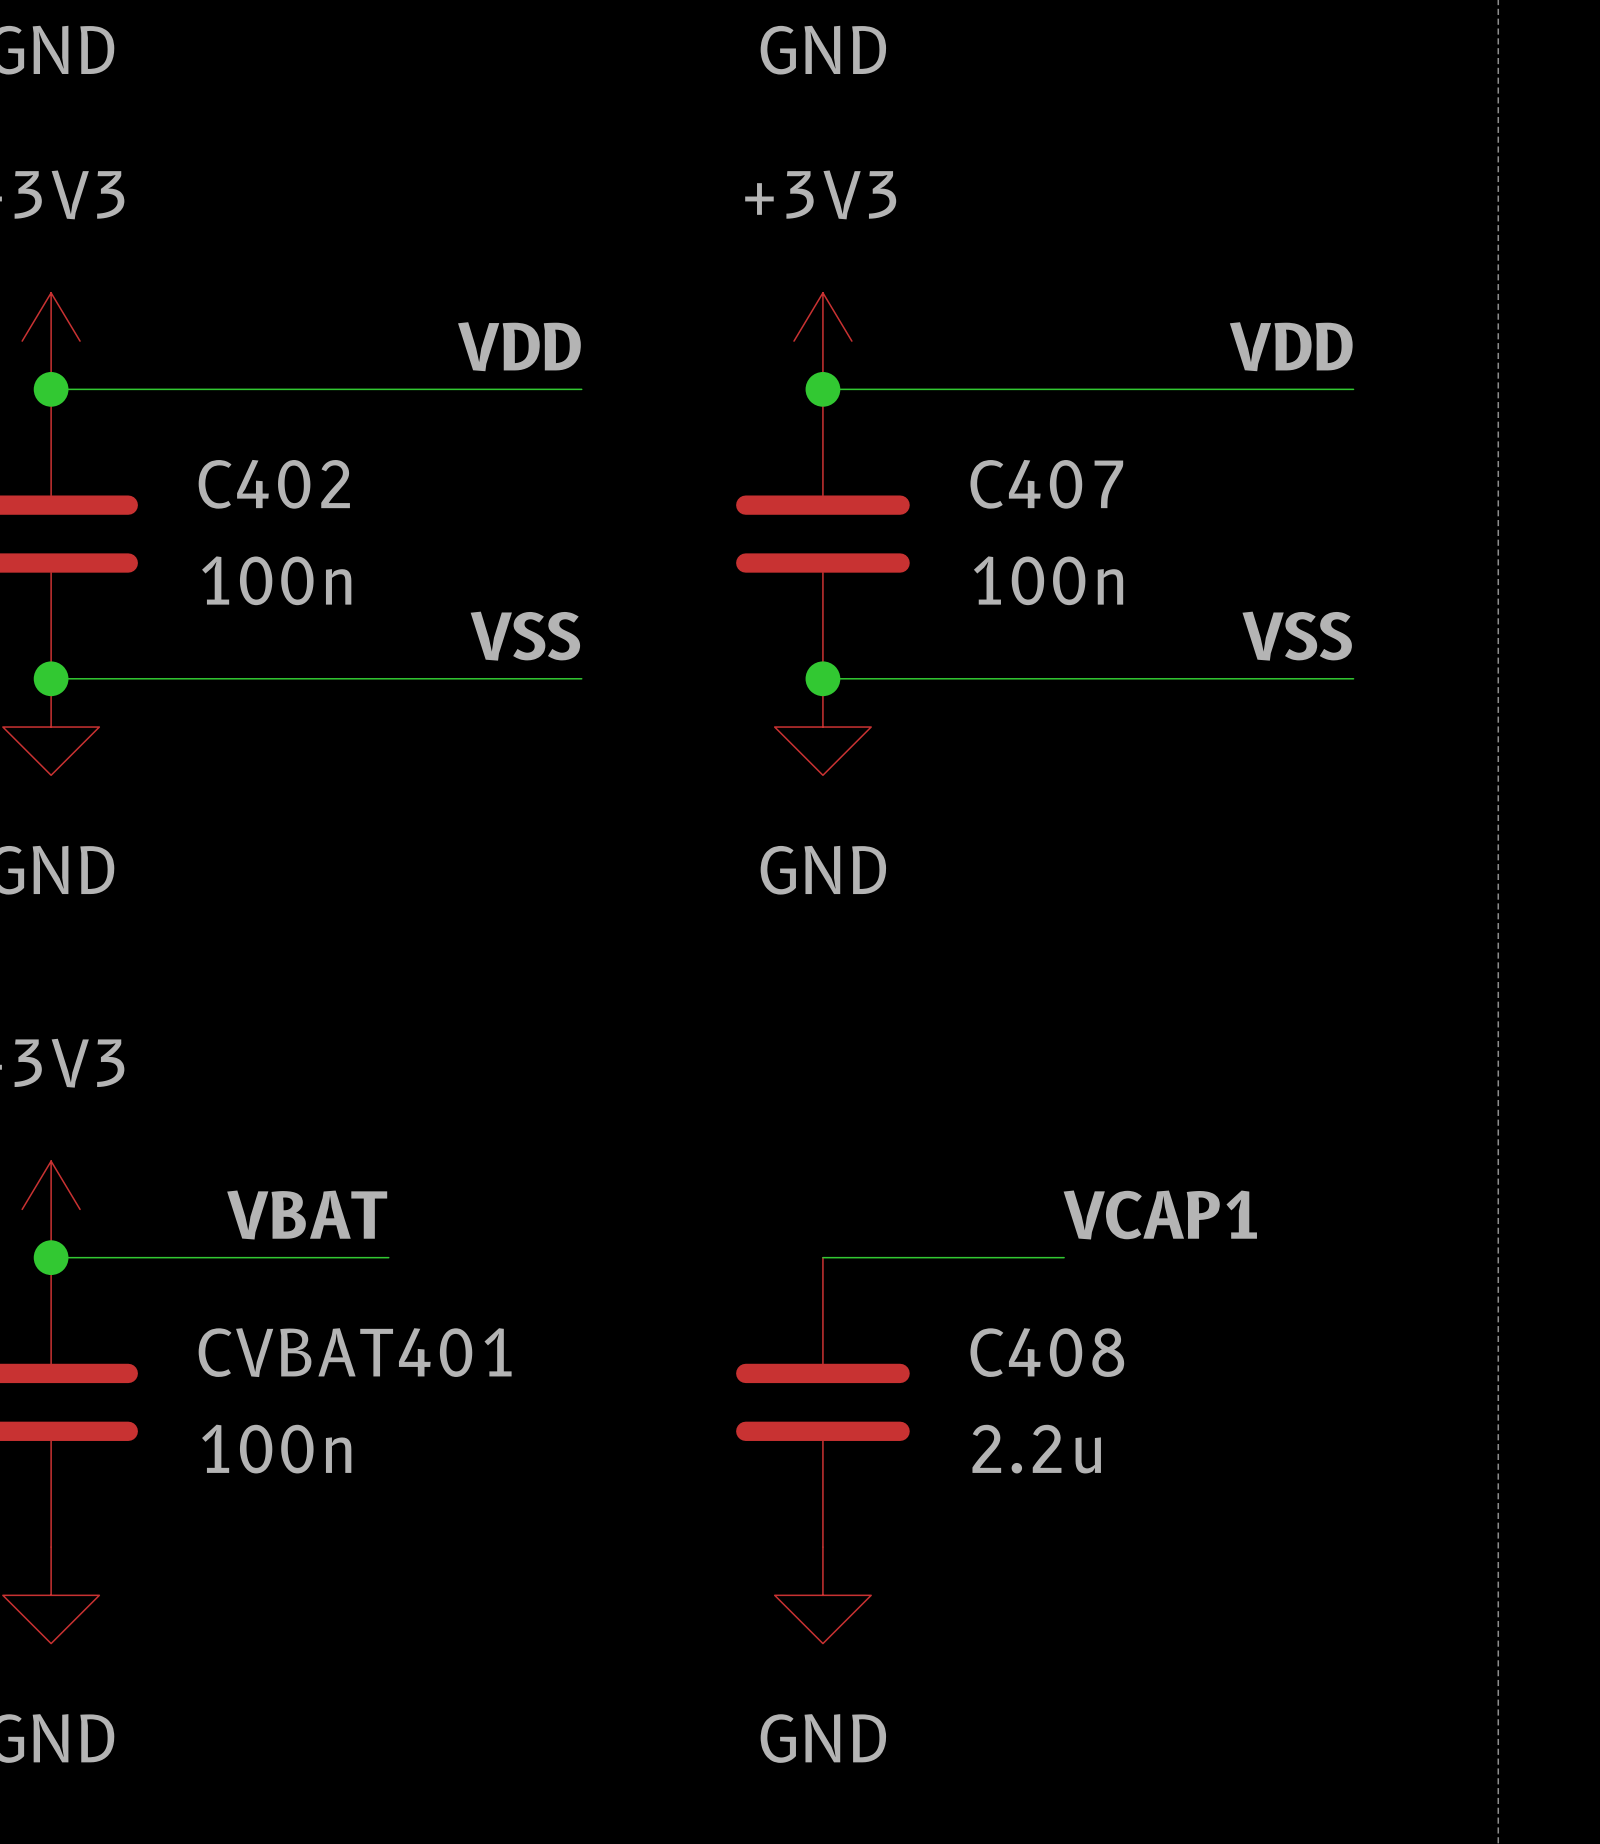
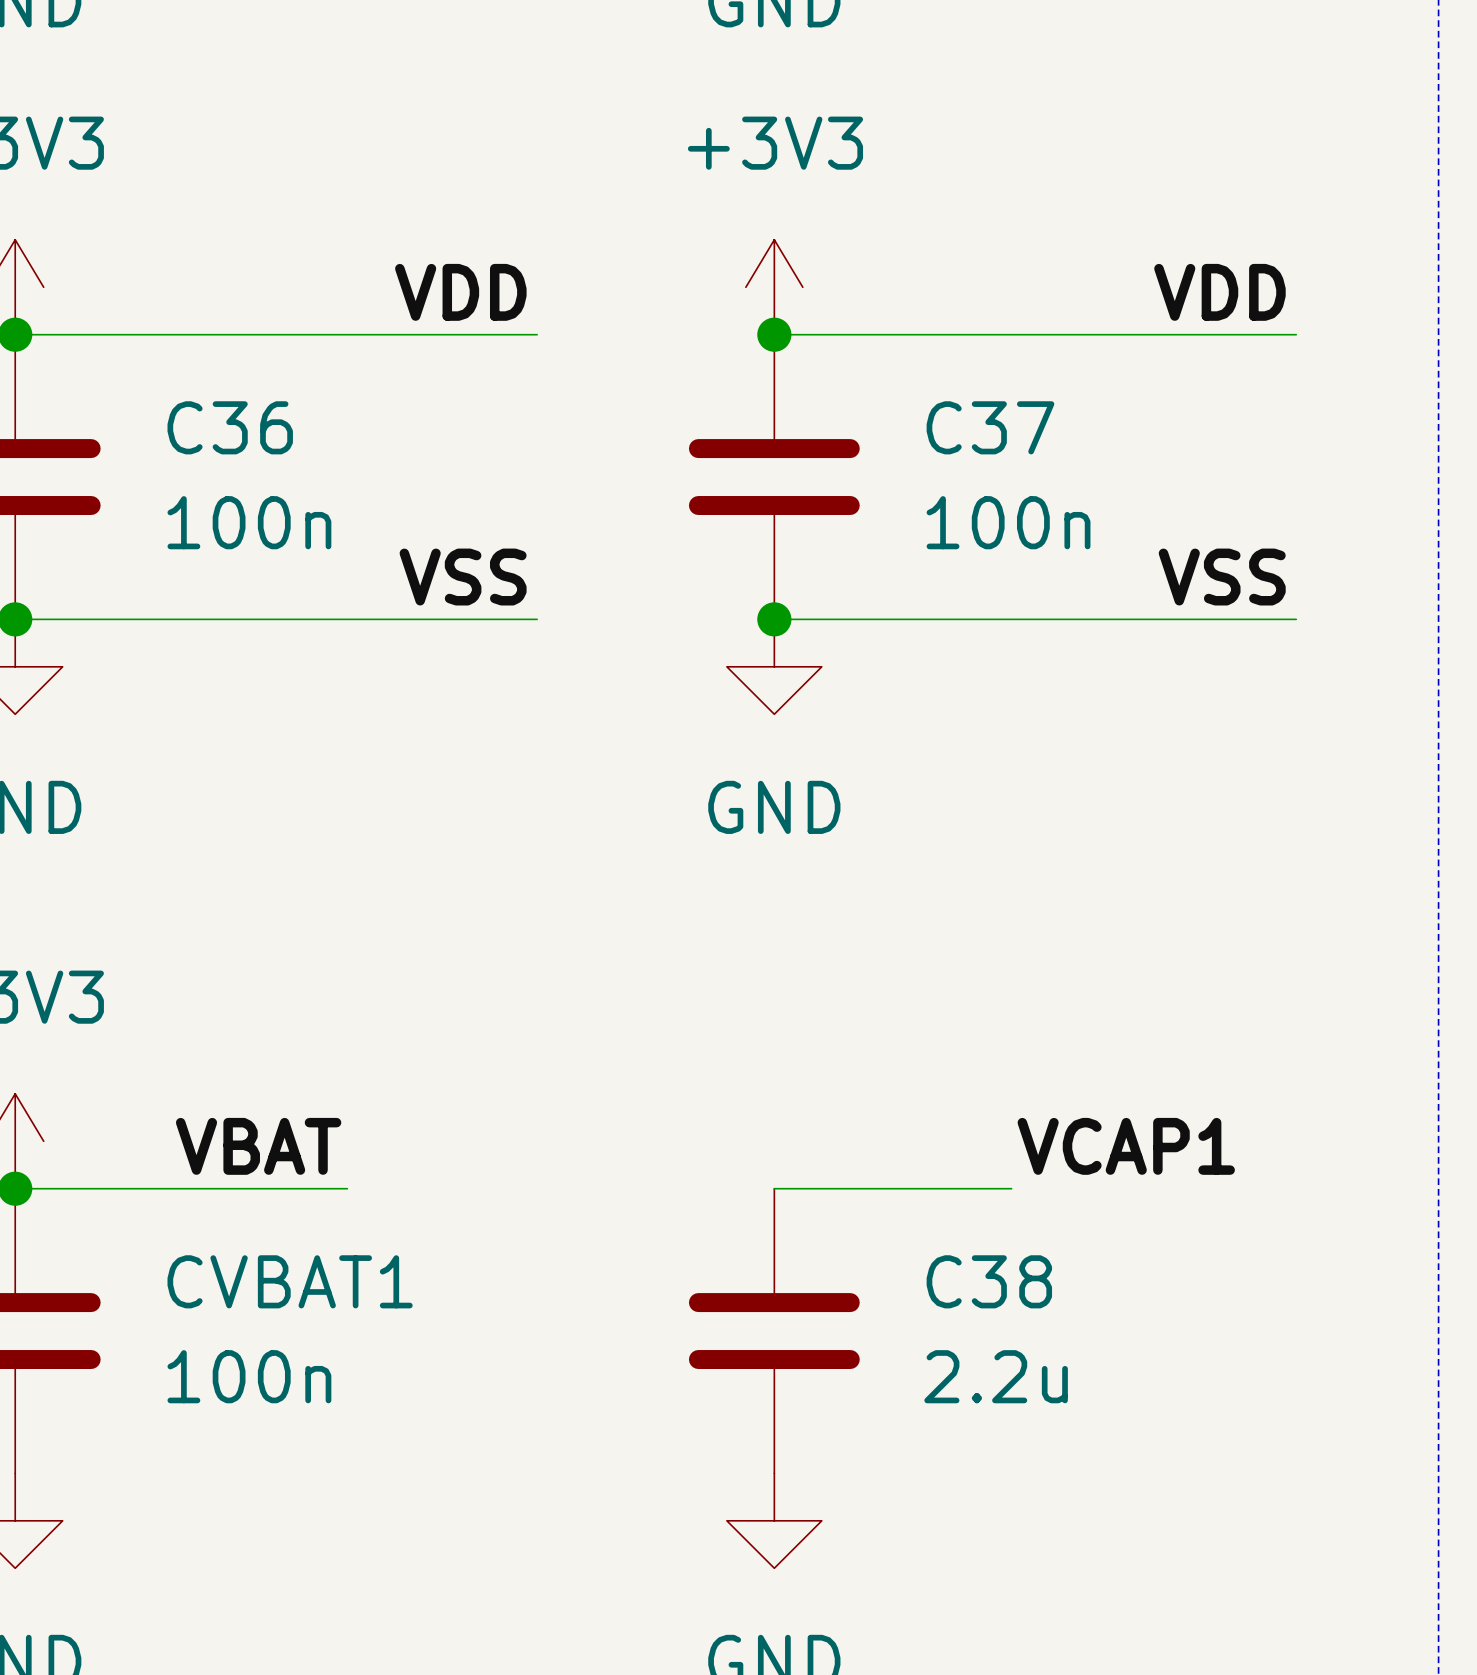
C402 name: C402 (274, 484) -> C36 (230, 427)
C407 name: C407 (1046, 484) -> C37 (990, 427)
CVBAT401 name: CVBAT401 (355, 1352) -> CVBAT1 (290, 1281)
C408 name: C408 (1047, 1352) -> C38 (989, 1281)

